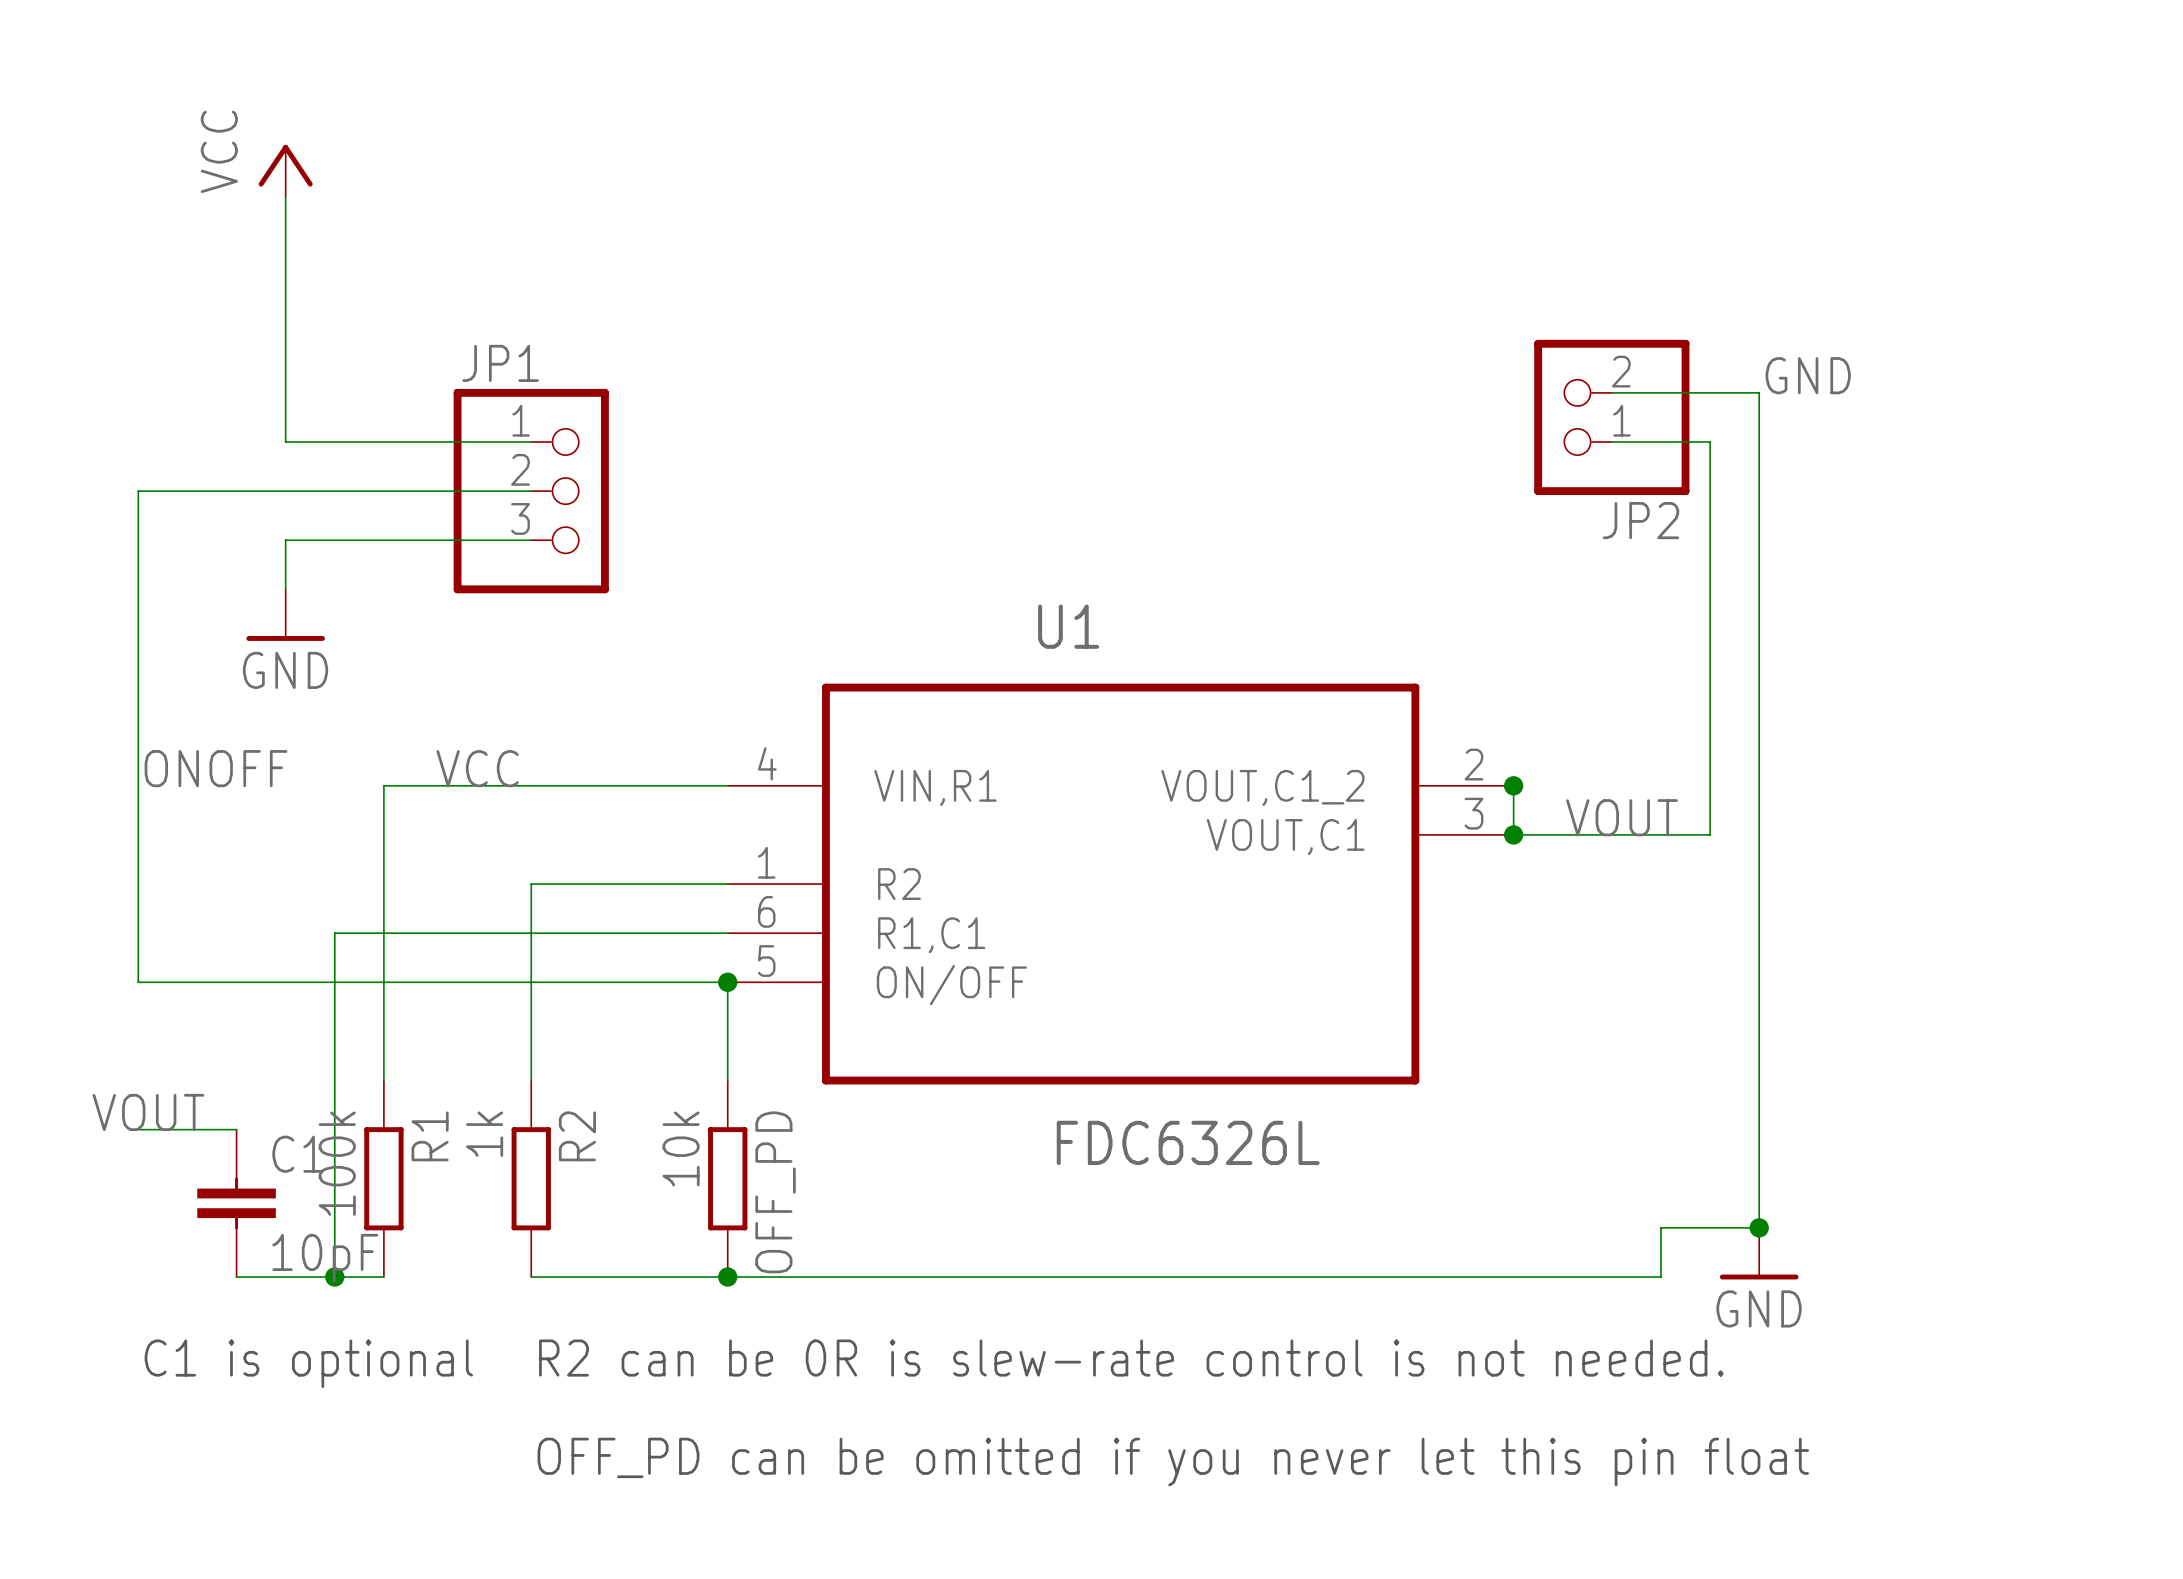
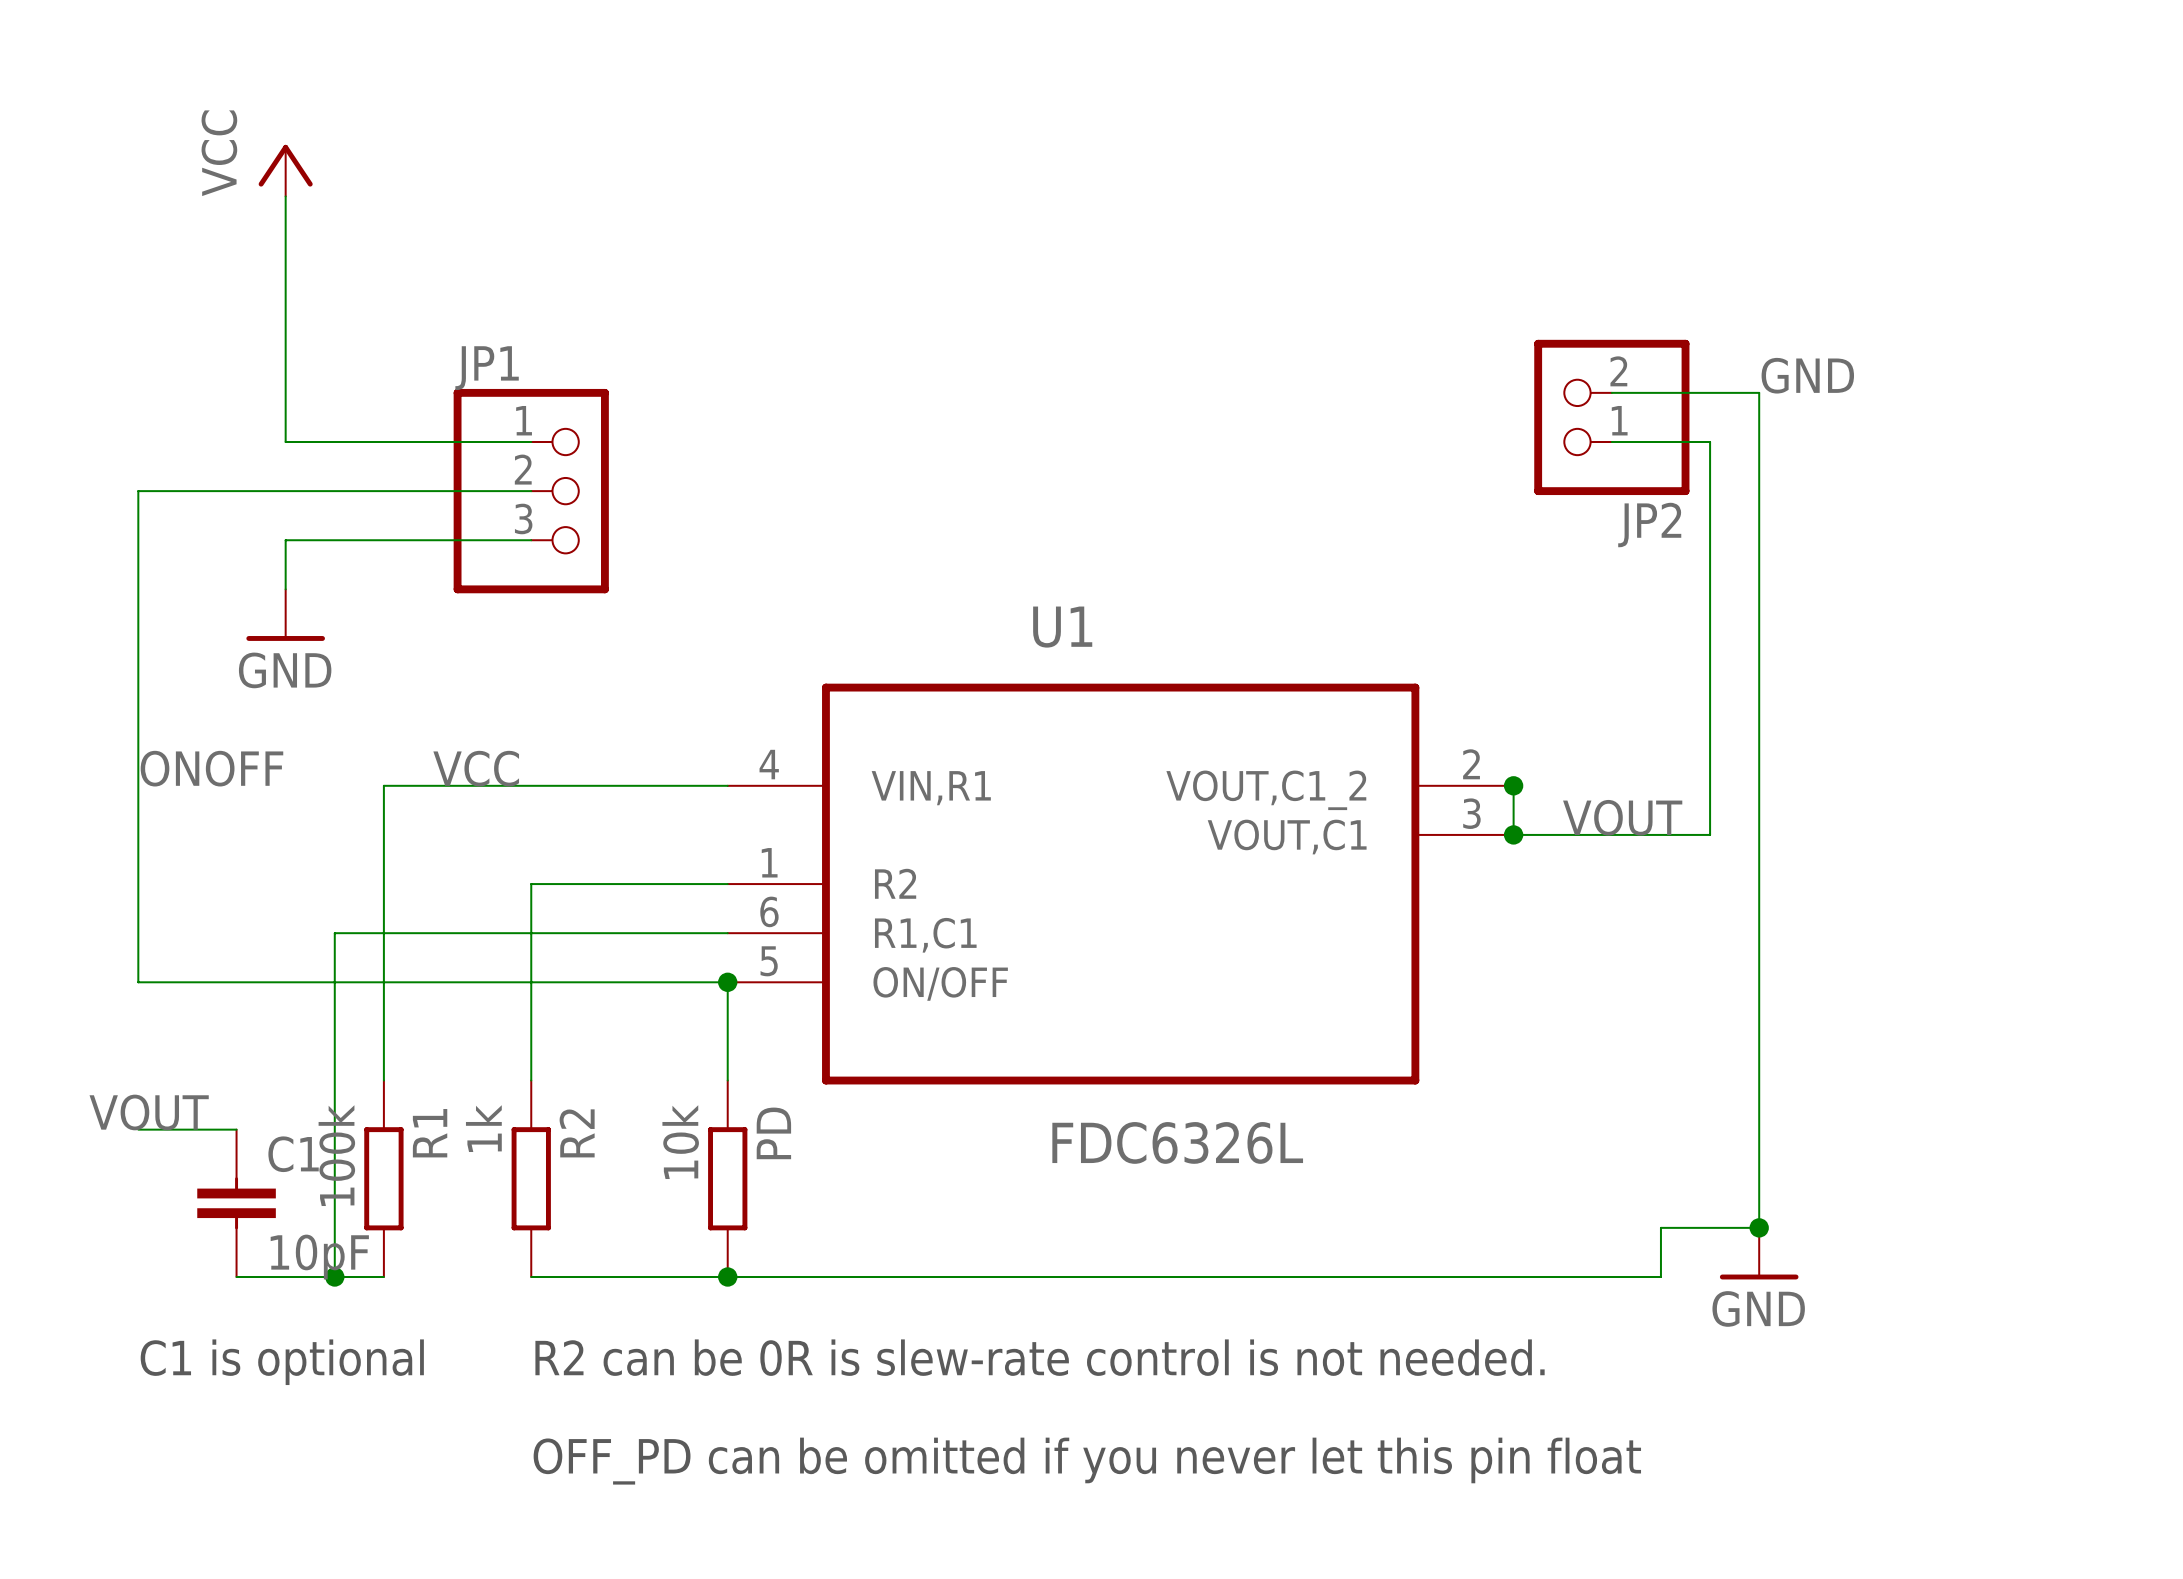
OFF_PD name: OFF_PD (775, 1192) -> PD (773, 1133)

